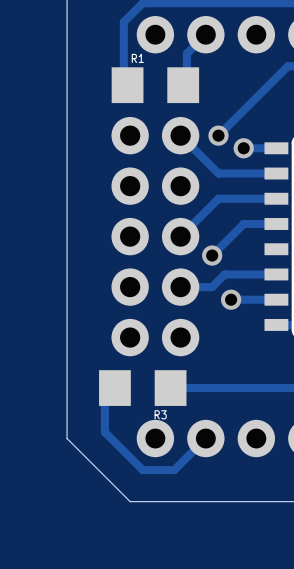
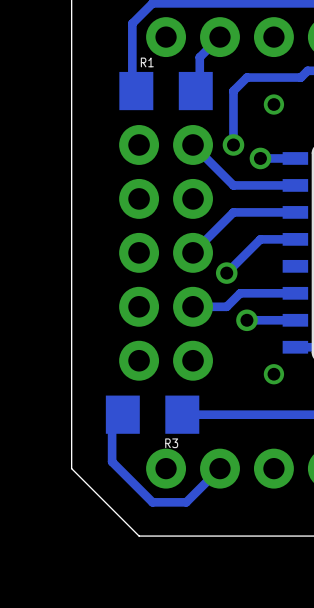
track: (281, 72) (218, 135) -> (300, 77) (246, 77) (233, 91) (233, 144)
via: none -> (273, 104)
via: none -> (273, 374)

